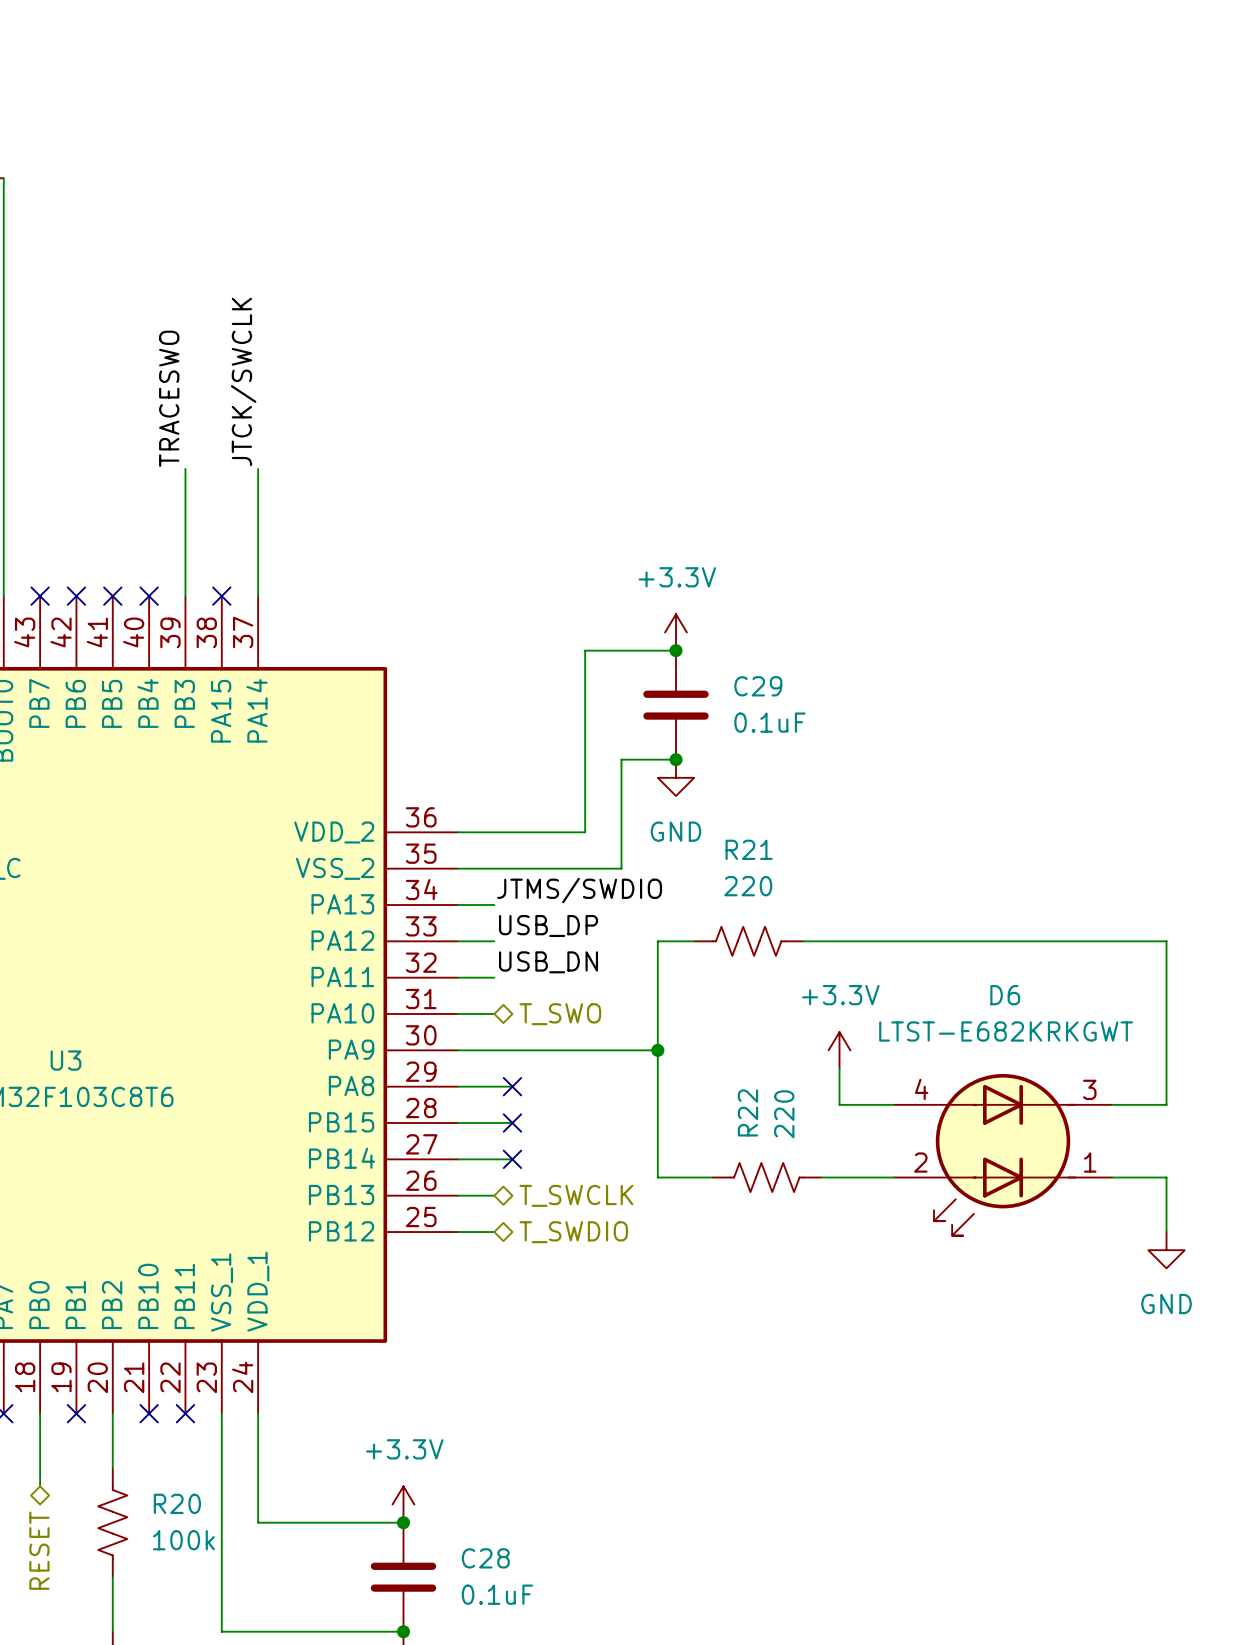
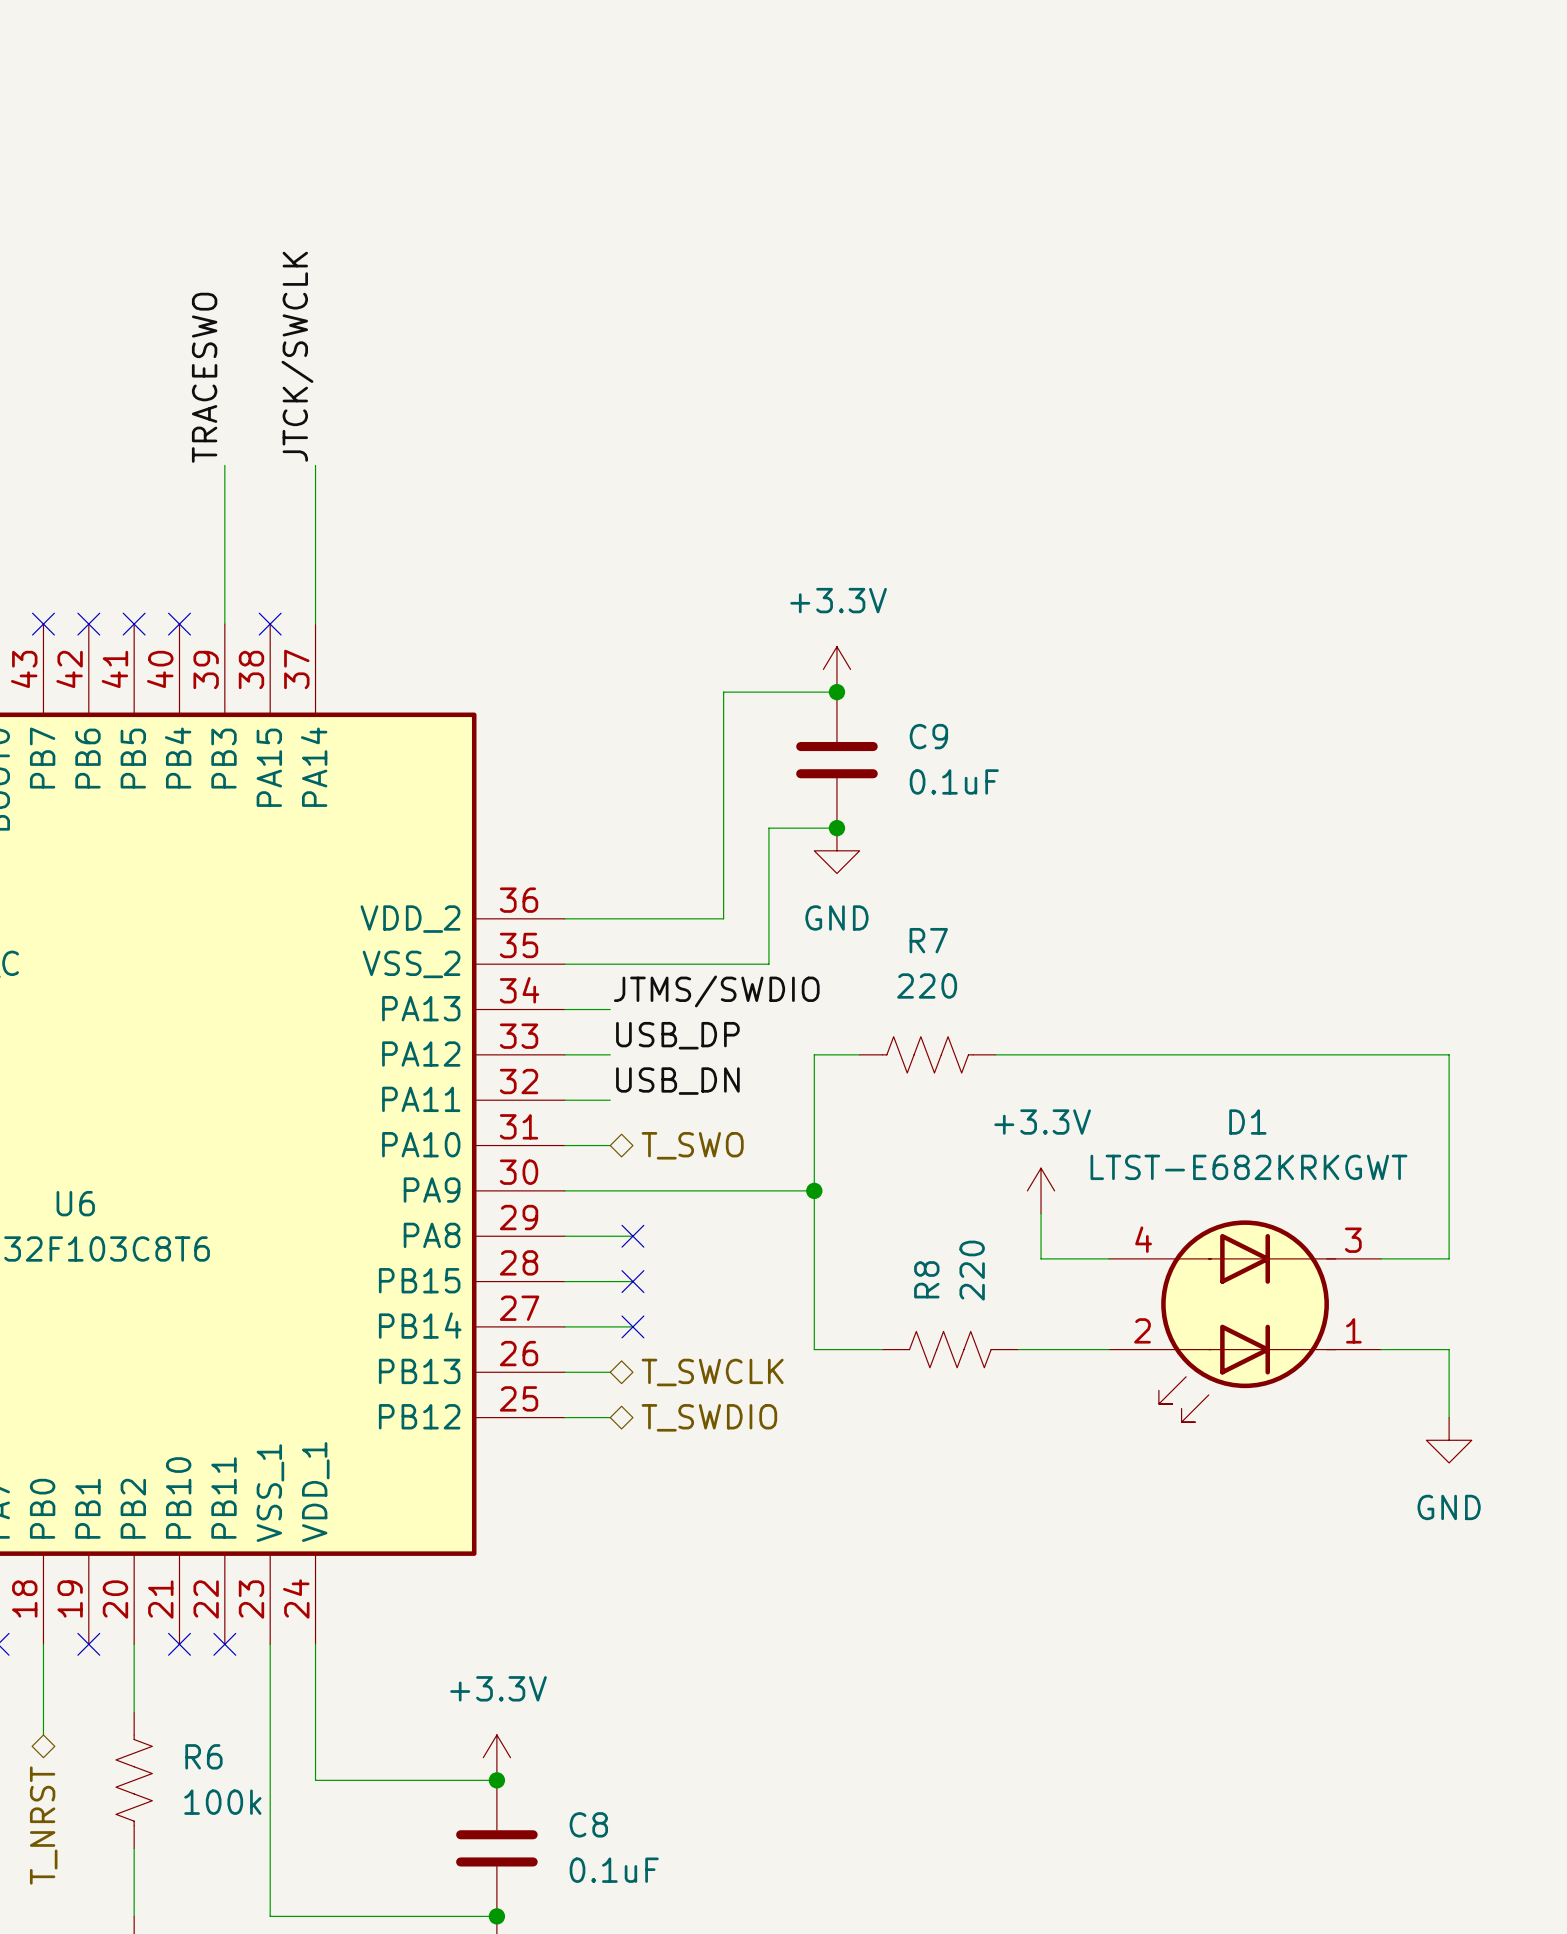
C29 name: C29 (758, 686) -> C9 (928, 736)
R21 name: R21 (749, 849) -> R7 (928, 940)
D6 name: D6 (1005, 995) -> D1 (1247, 1122)
U3 name: U3 (65, 1060) -> U6 (75, 1203)
R22 name: R22 (747, 1112) -> R8 (926, 1279)
R20 name: R20 (177, 1503) -> R6 (203, 1756)
hierarchical label: RESET (39, 1550) -> T_NRST (43, 1825)
C28 name: C28 (485, 1558) -> C8 (588, 1824)

